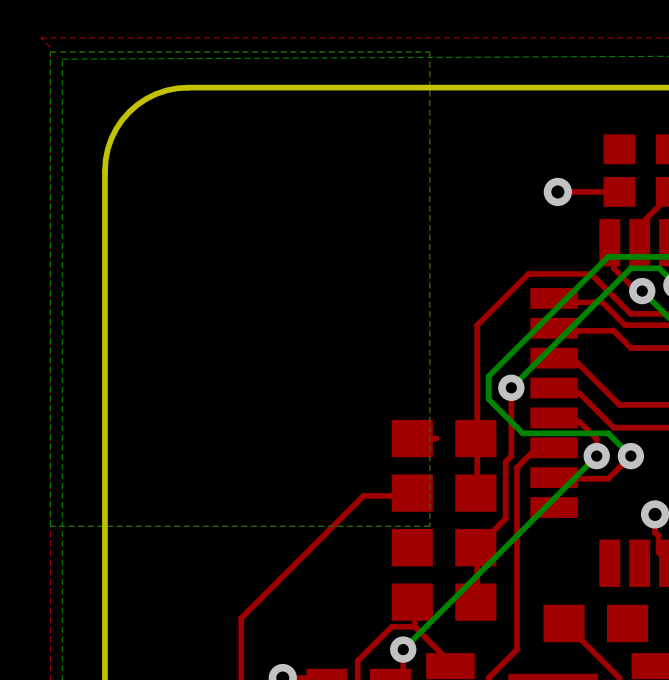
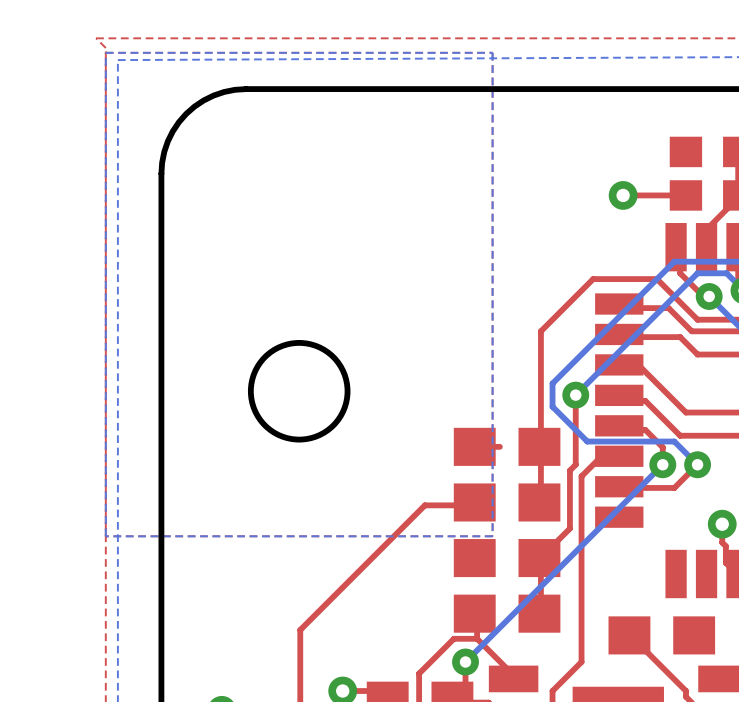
round board edge: none -> [247, 340, 351, 443]

